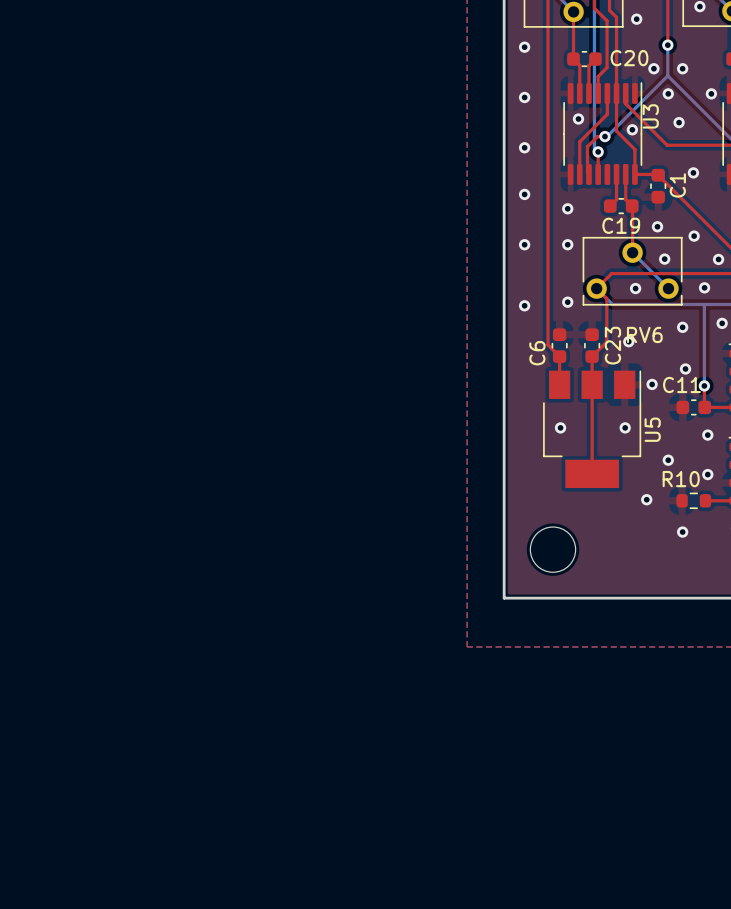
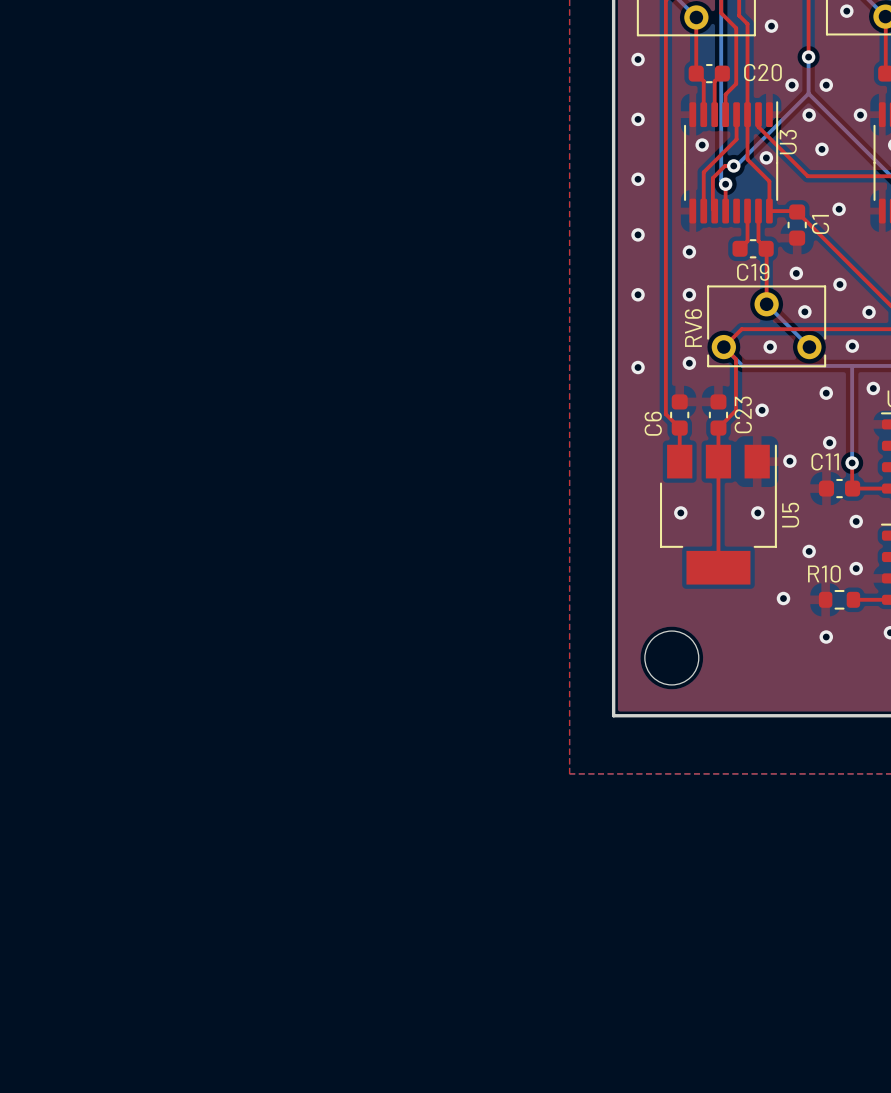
RV6 name rotation: 0° (644, 334) -> 90° counterclockwise (693, 328)
RV6 name position: RV6 (644, 334) -> RV6 (693, 328)

